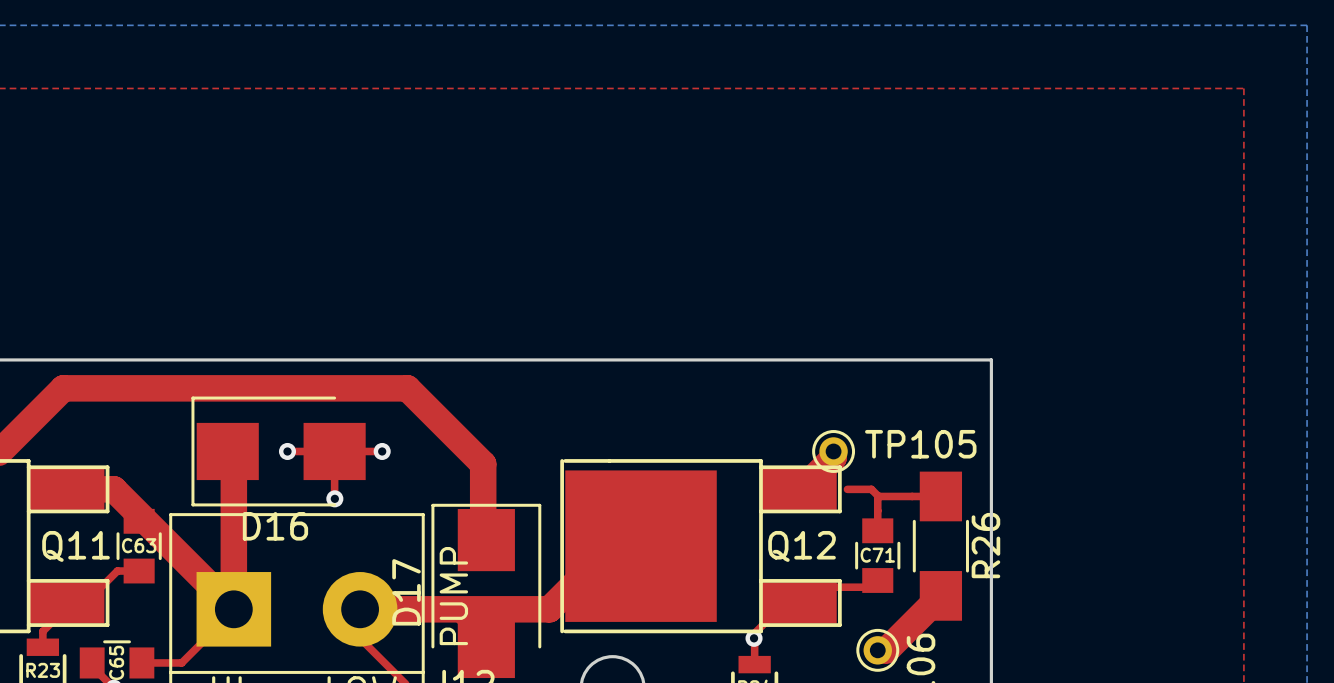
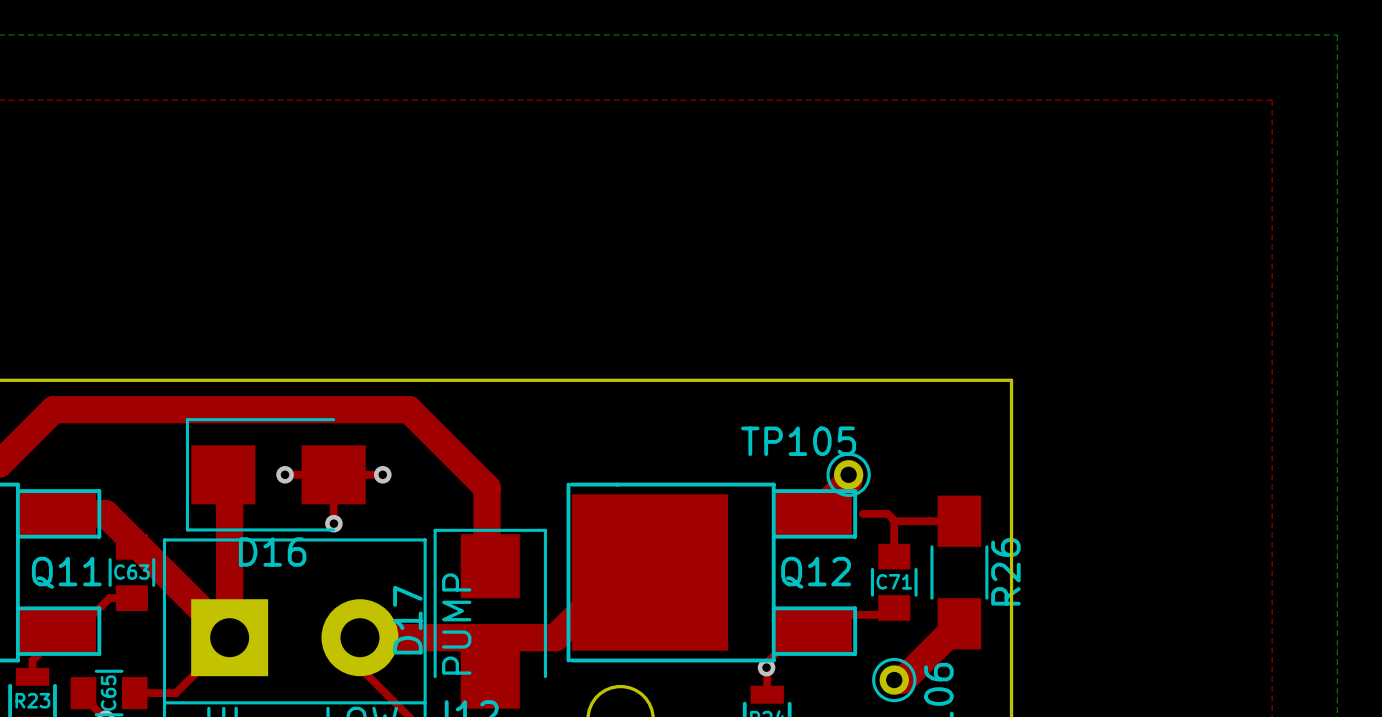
TP105 name position: TP105 (920, 444) -> TP105 (798, 441)

